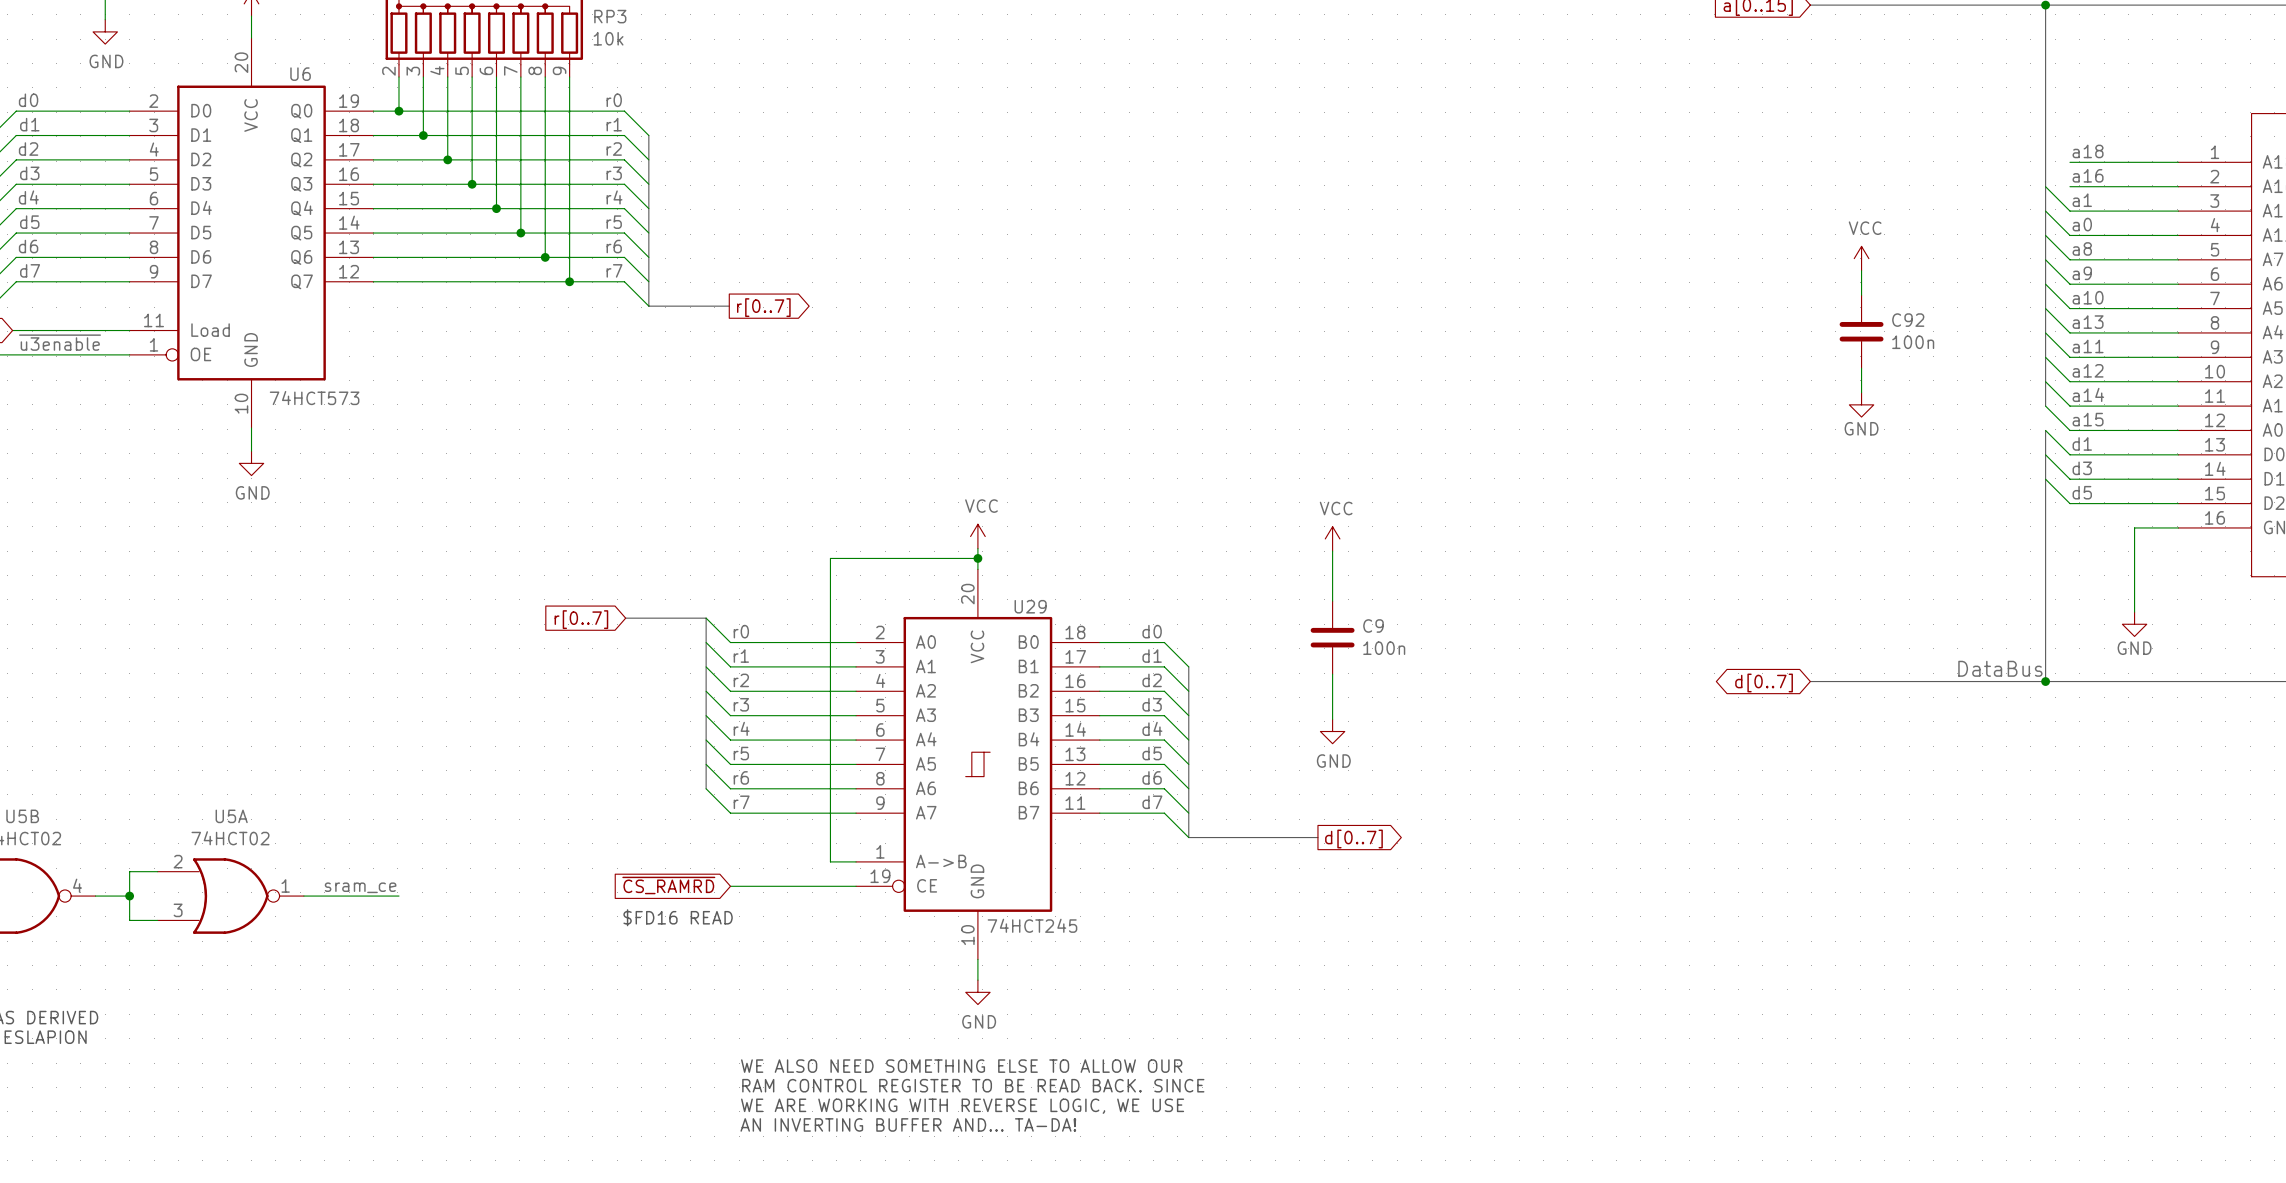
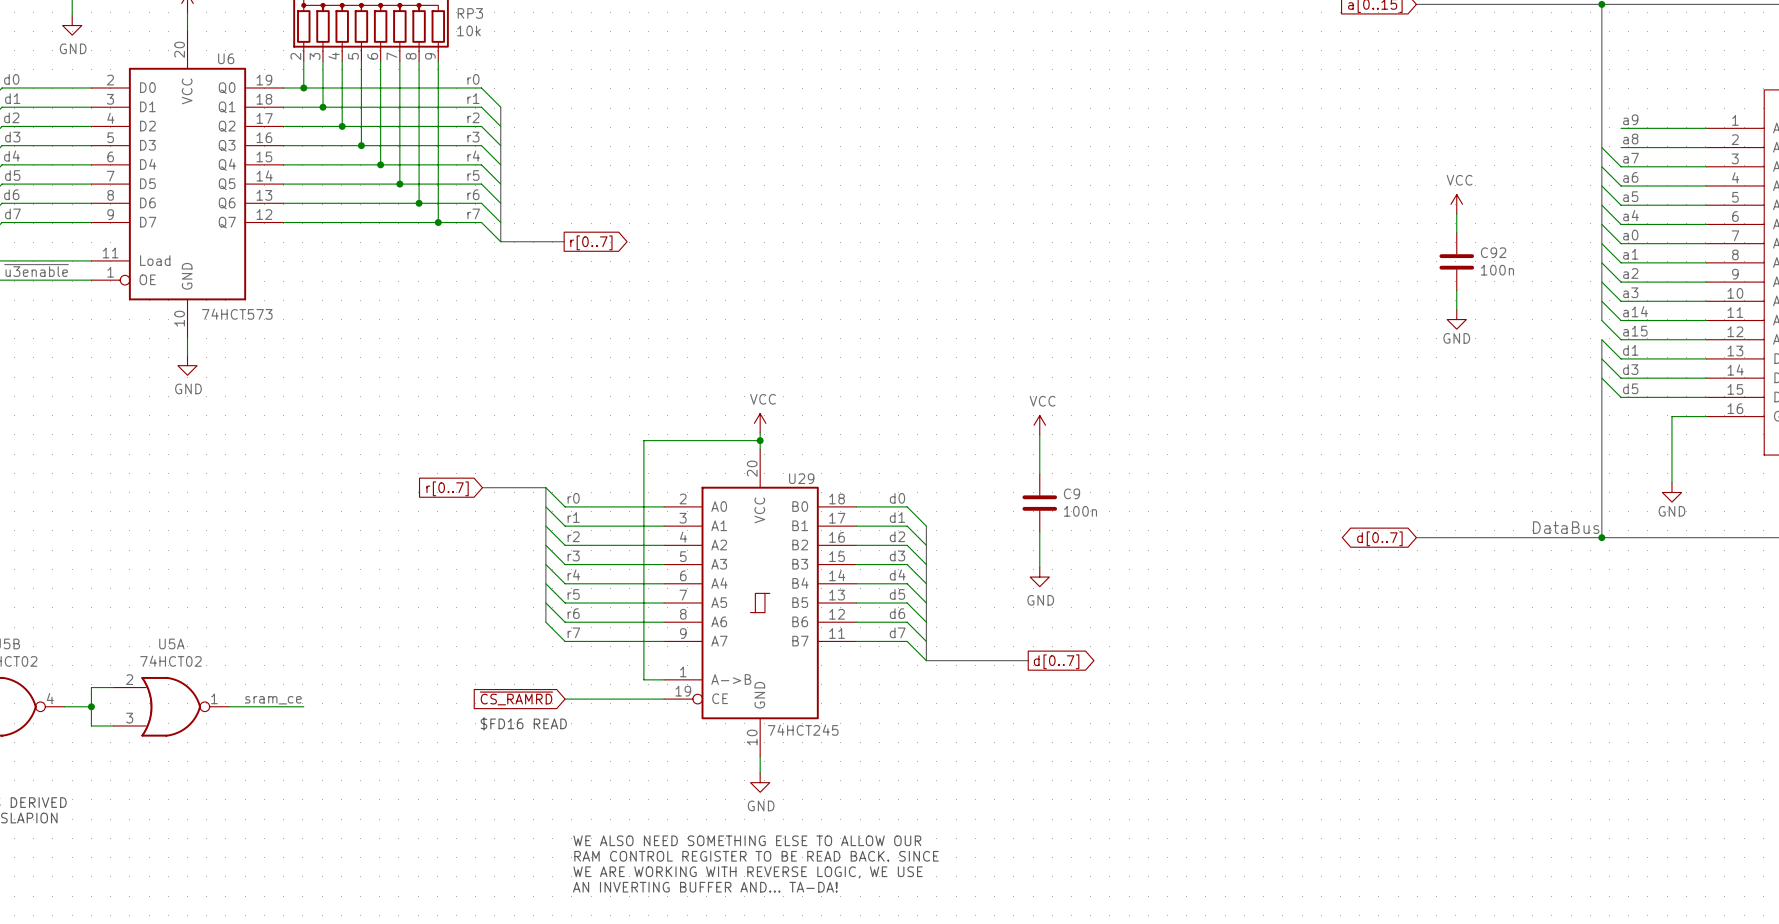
label: a18 (2088, 151) -> a9 (1630, 119)
label: a16 (2088, 175) -> a8 (1630, 138)
label: a1 (2082, 200) -> a7 (1630, 158)
label: a0 (2082, 224) -> a6 (1630, 177)
label: a8 (2082, 248) -> a5 (1630, 196)
label: a9 (2082, 273) -> a4 (1630, 215)
label: a10 (2088, 297) -> a0 (1630, 235)
label: a13 (2088, 322) -> a1 (1630, 254)
label: a11 (2088, 346) -> a2 (1630, 273)
label: a12 (2088, 370) -> a3 (1630, 292)

